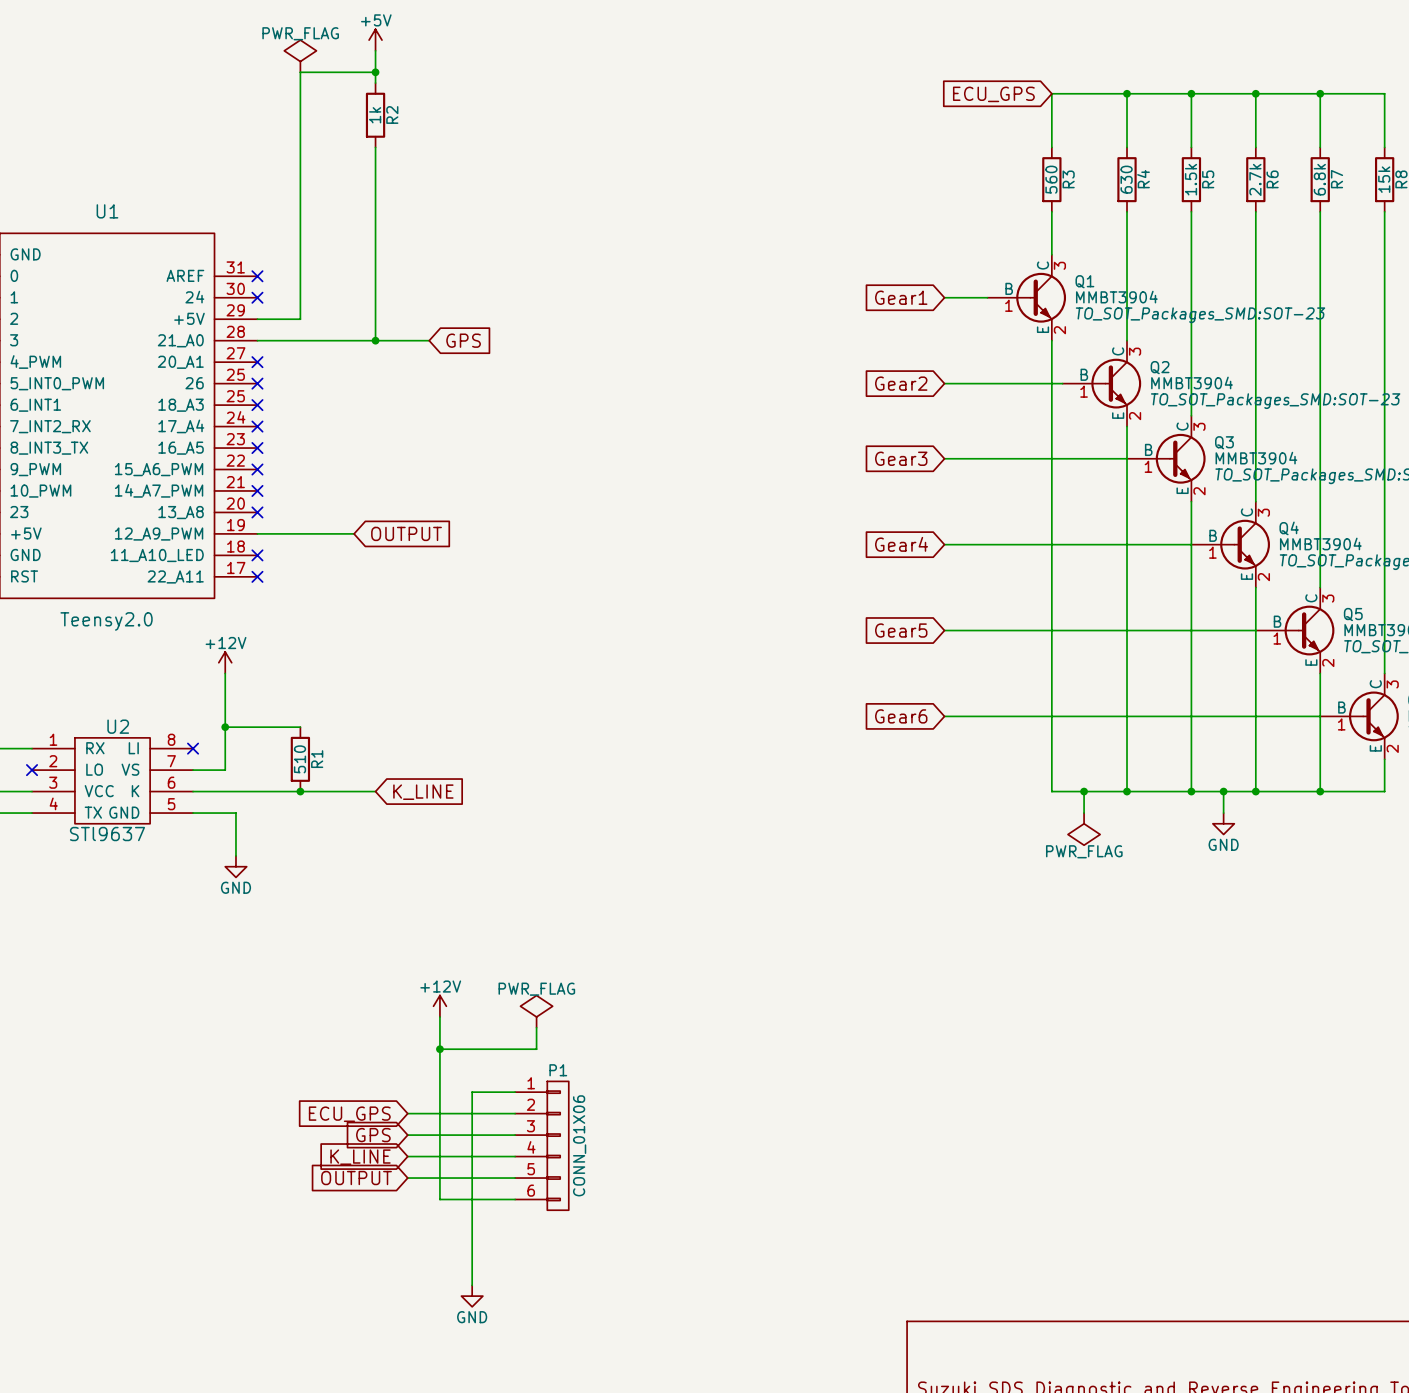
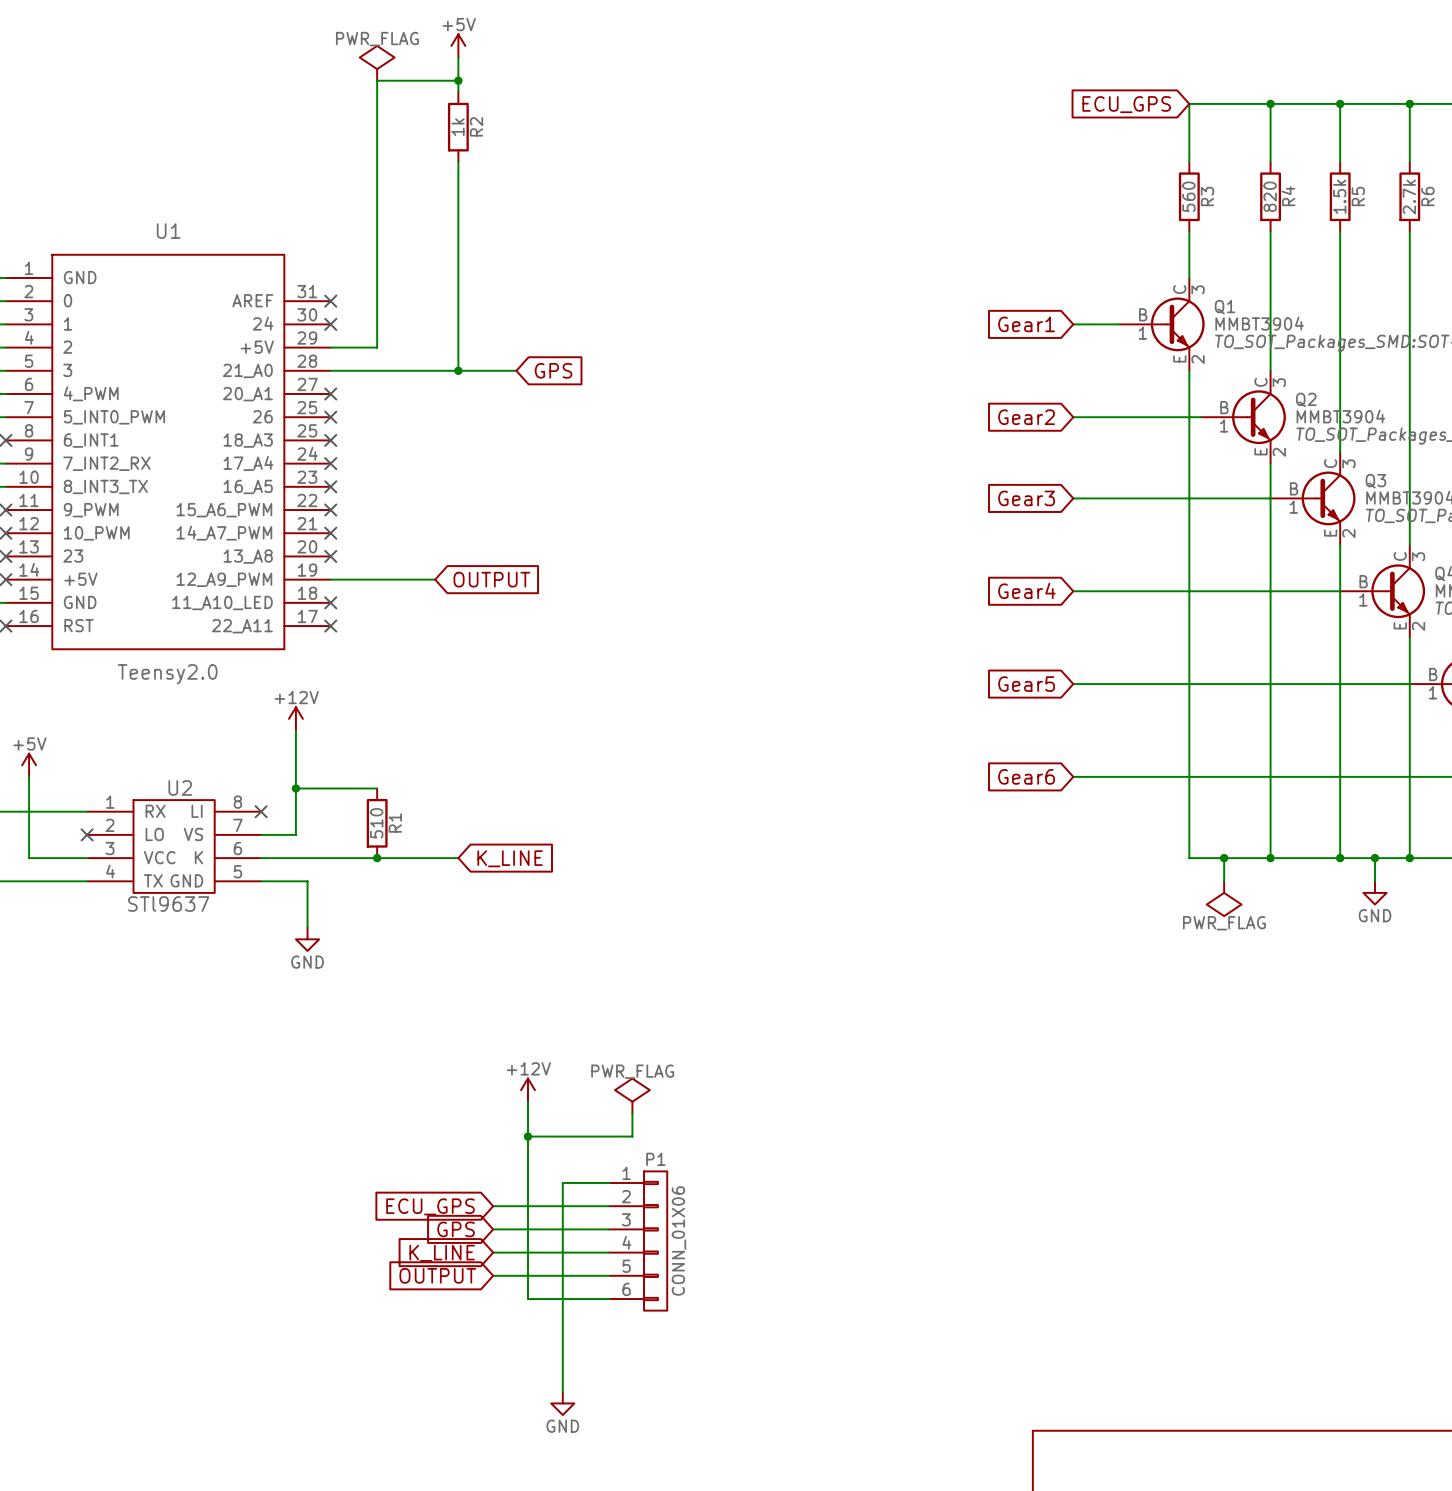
R4 value: 630 (1126, 179) -> 820 (1270, 196)

